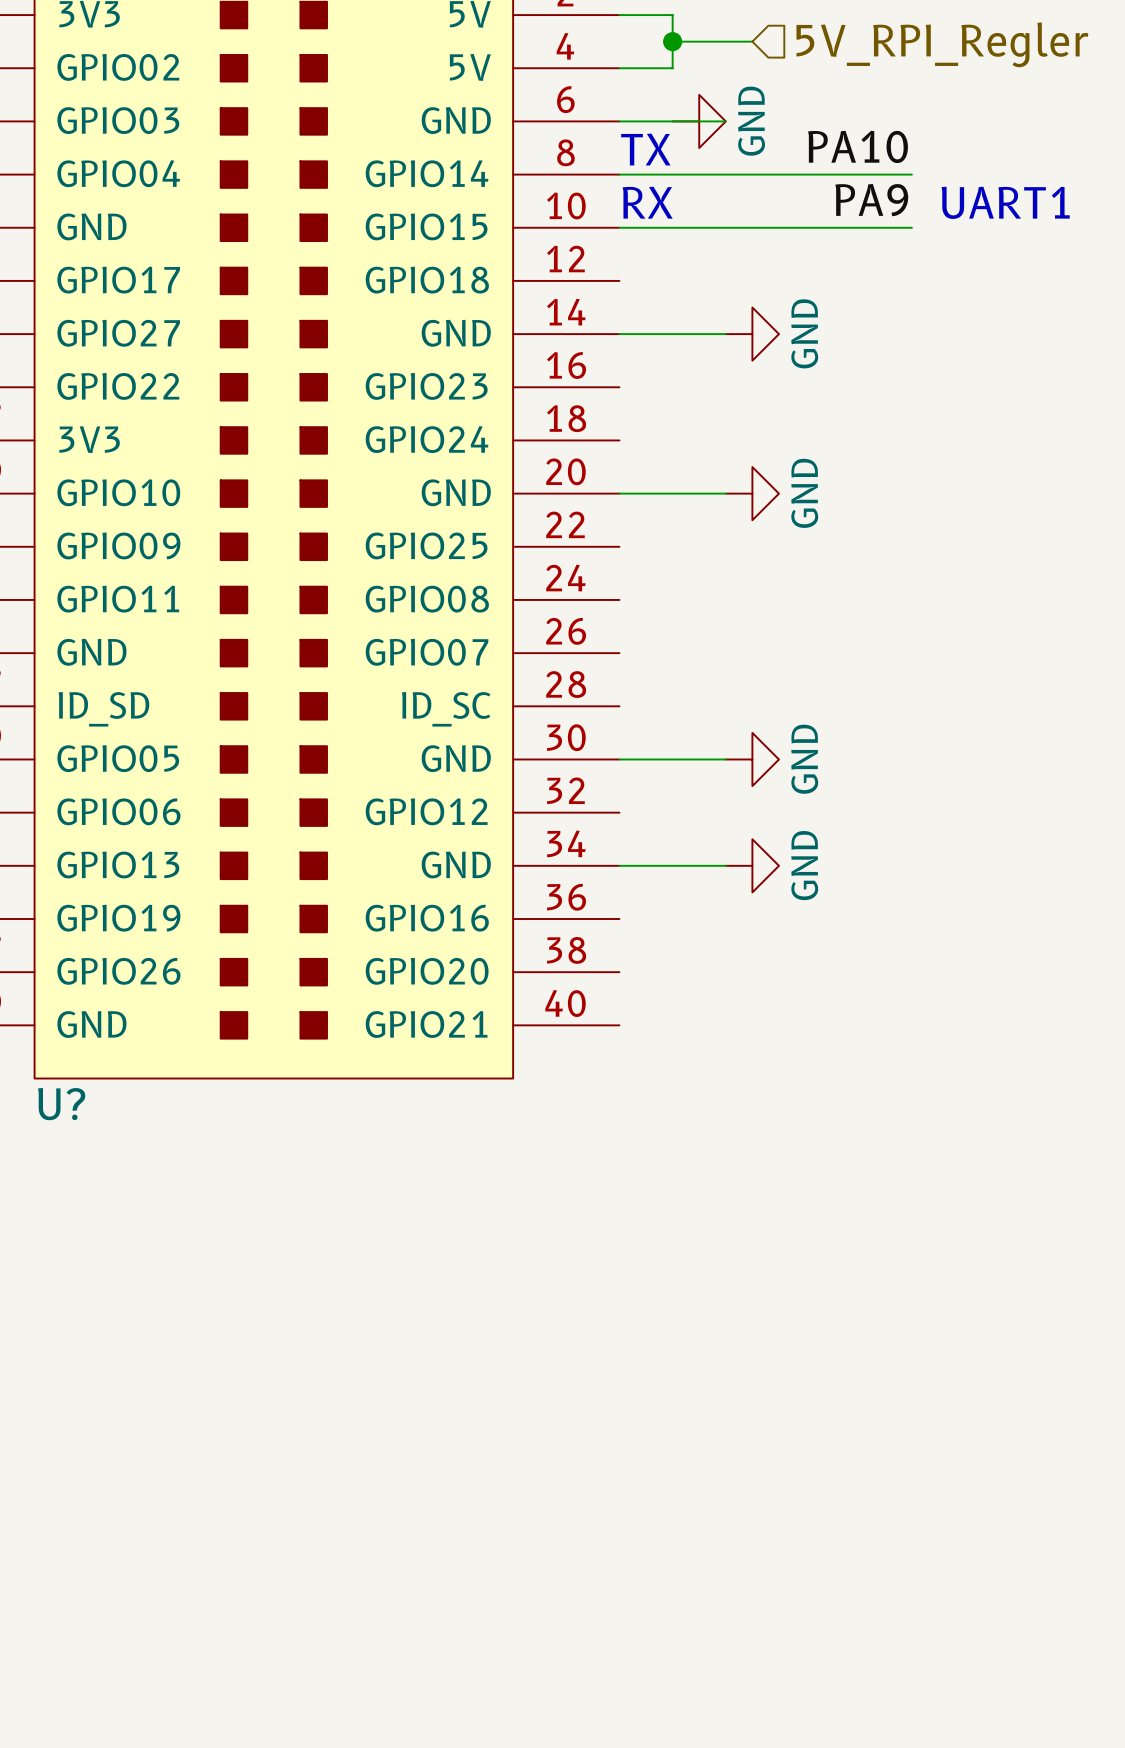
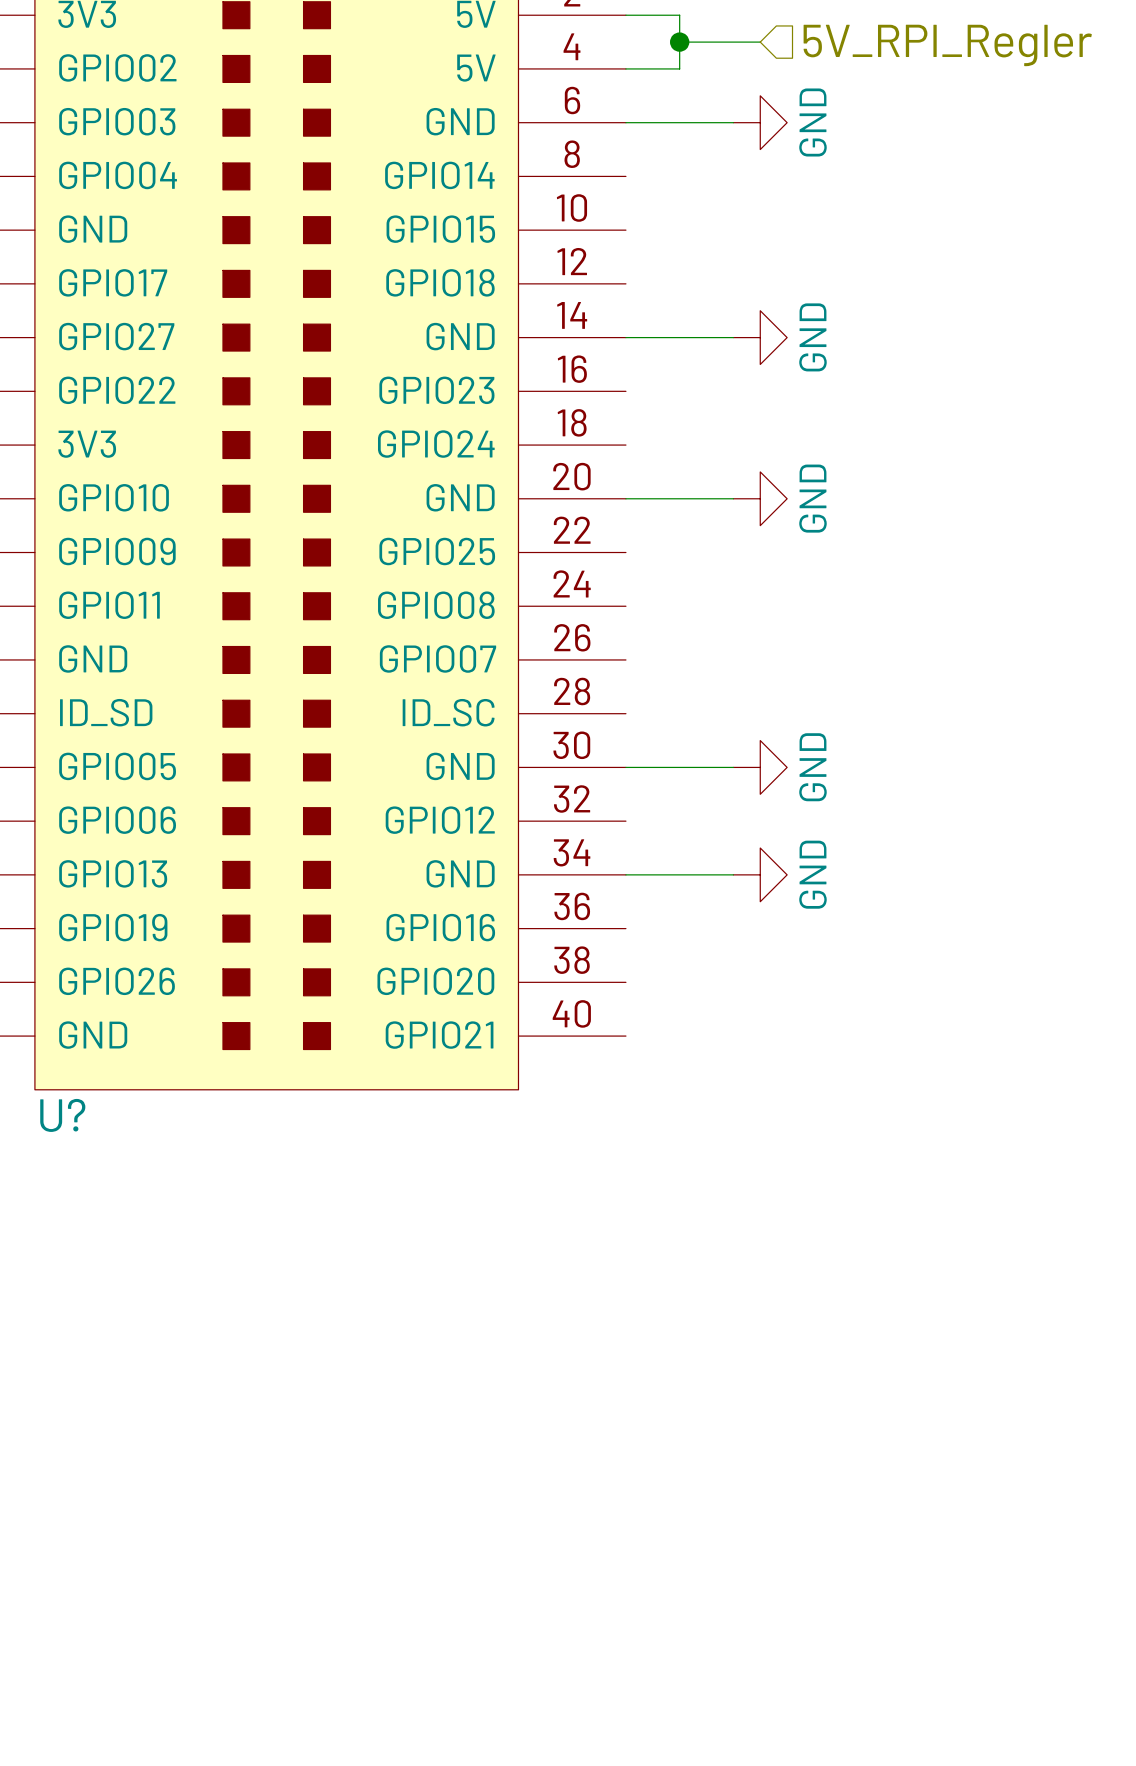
power symbol position: GND (699, 121) -> GND (760, 122)
label: PA10 (858, 146) -> none
text: TX (645, 149) -> none
wire: (619, 174) (911, 174) -> none
label: PA9 (871, 200) -> none
text: RX (647, 202) -> none
text: UART1 (1005, 202) -> none
wire: (619, 227) (911, 227) -> none

